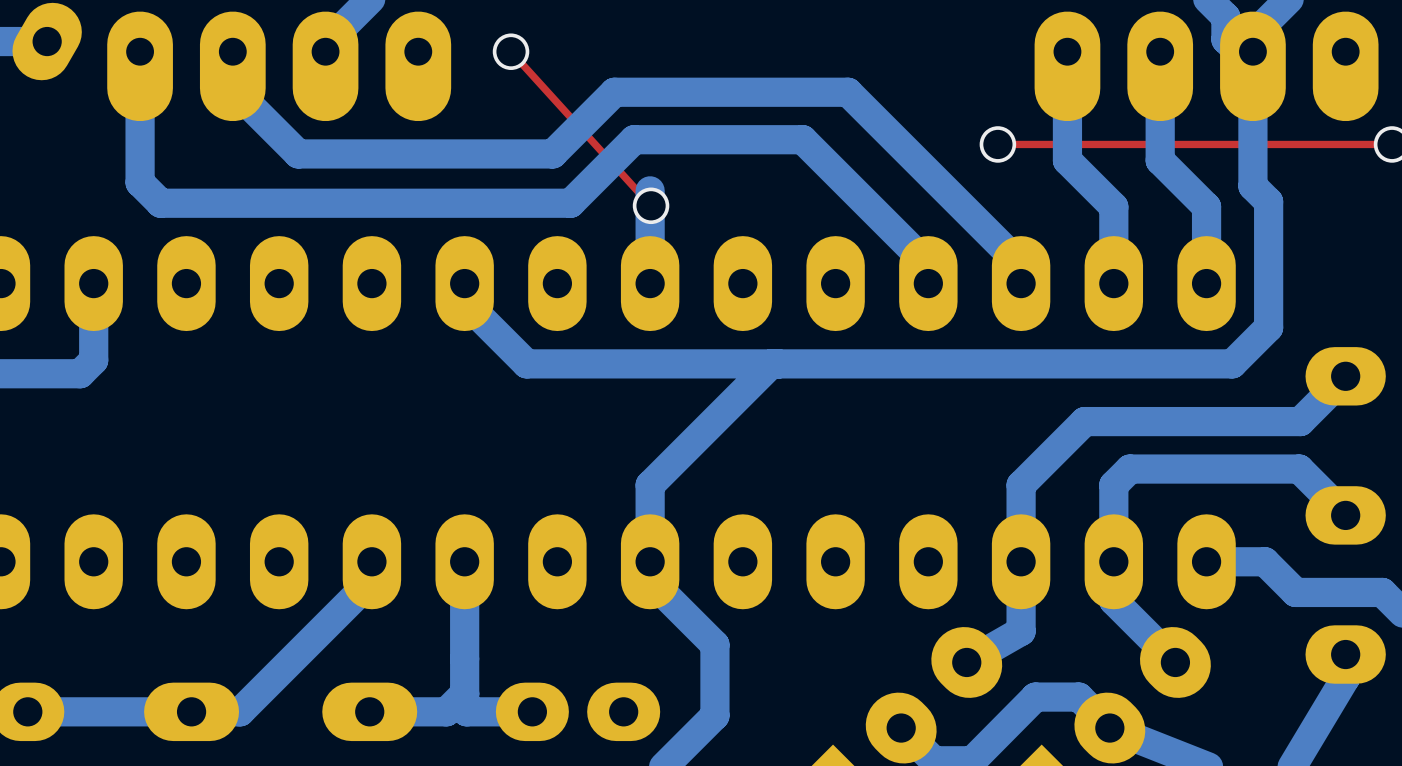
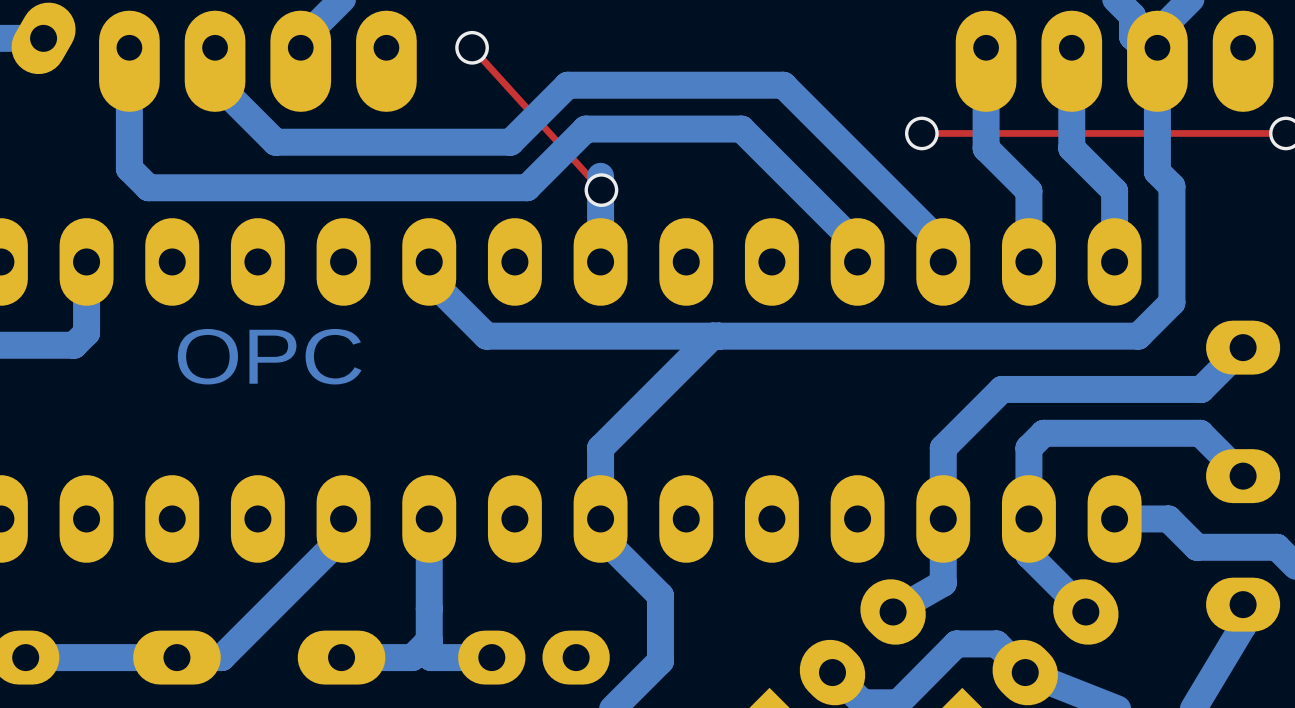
text: none -> OPC (269, 356)

